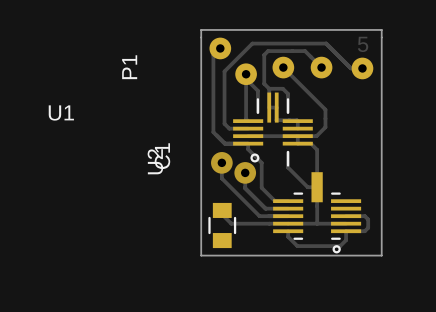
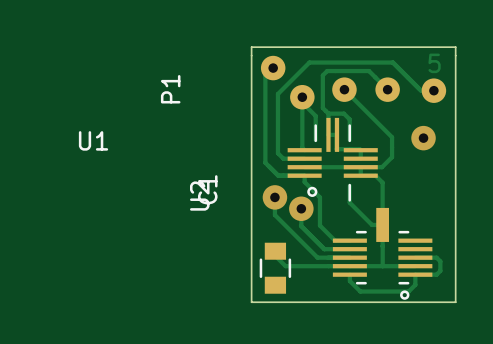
via: none -> (423, 138)

